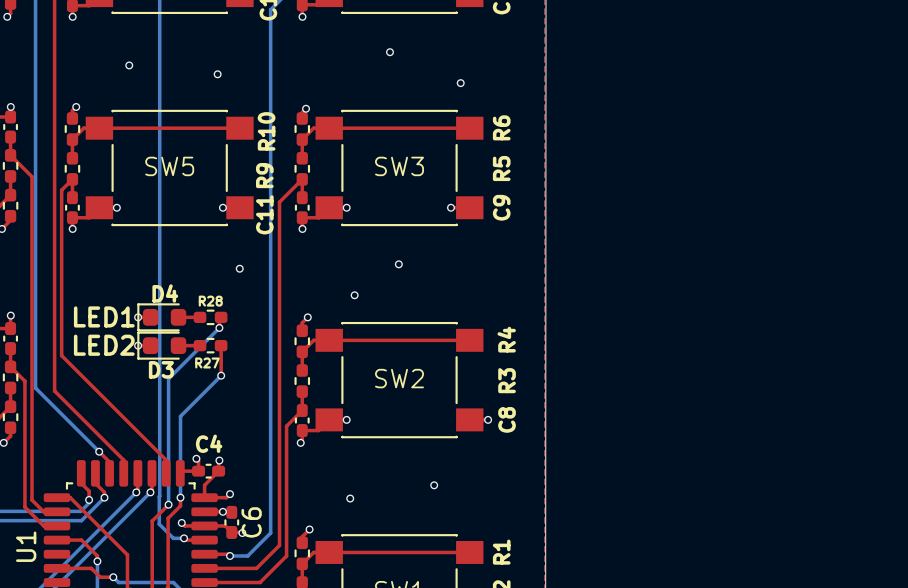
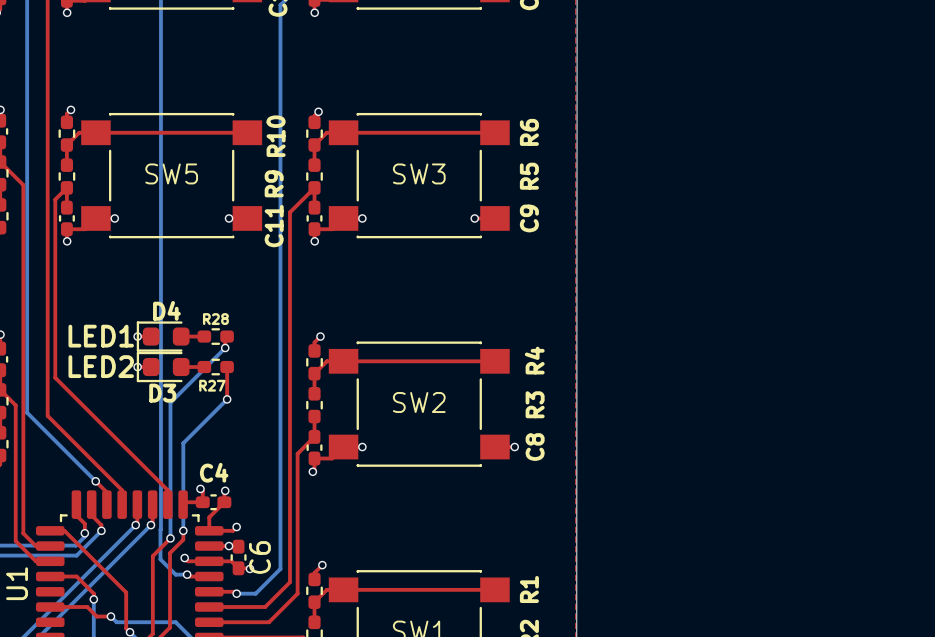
via: (389, 52) -> none
via: (129, 65) -> none
via: (217, 74) -> none
via: (460, 83) -> none
via: (398, 264) -> none
via: (239, 268) -> none
via: (354, 295) -> none
via: (434, 485) -> none
via: (350, 498) -> none

